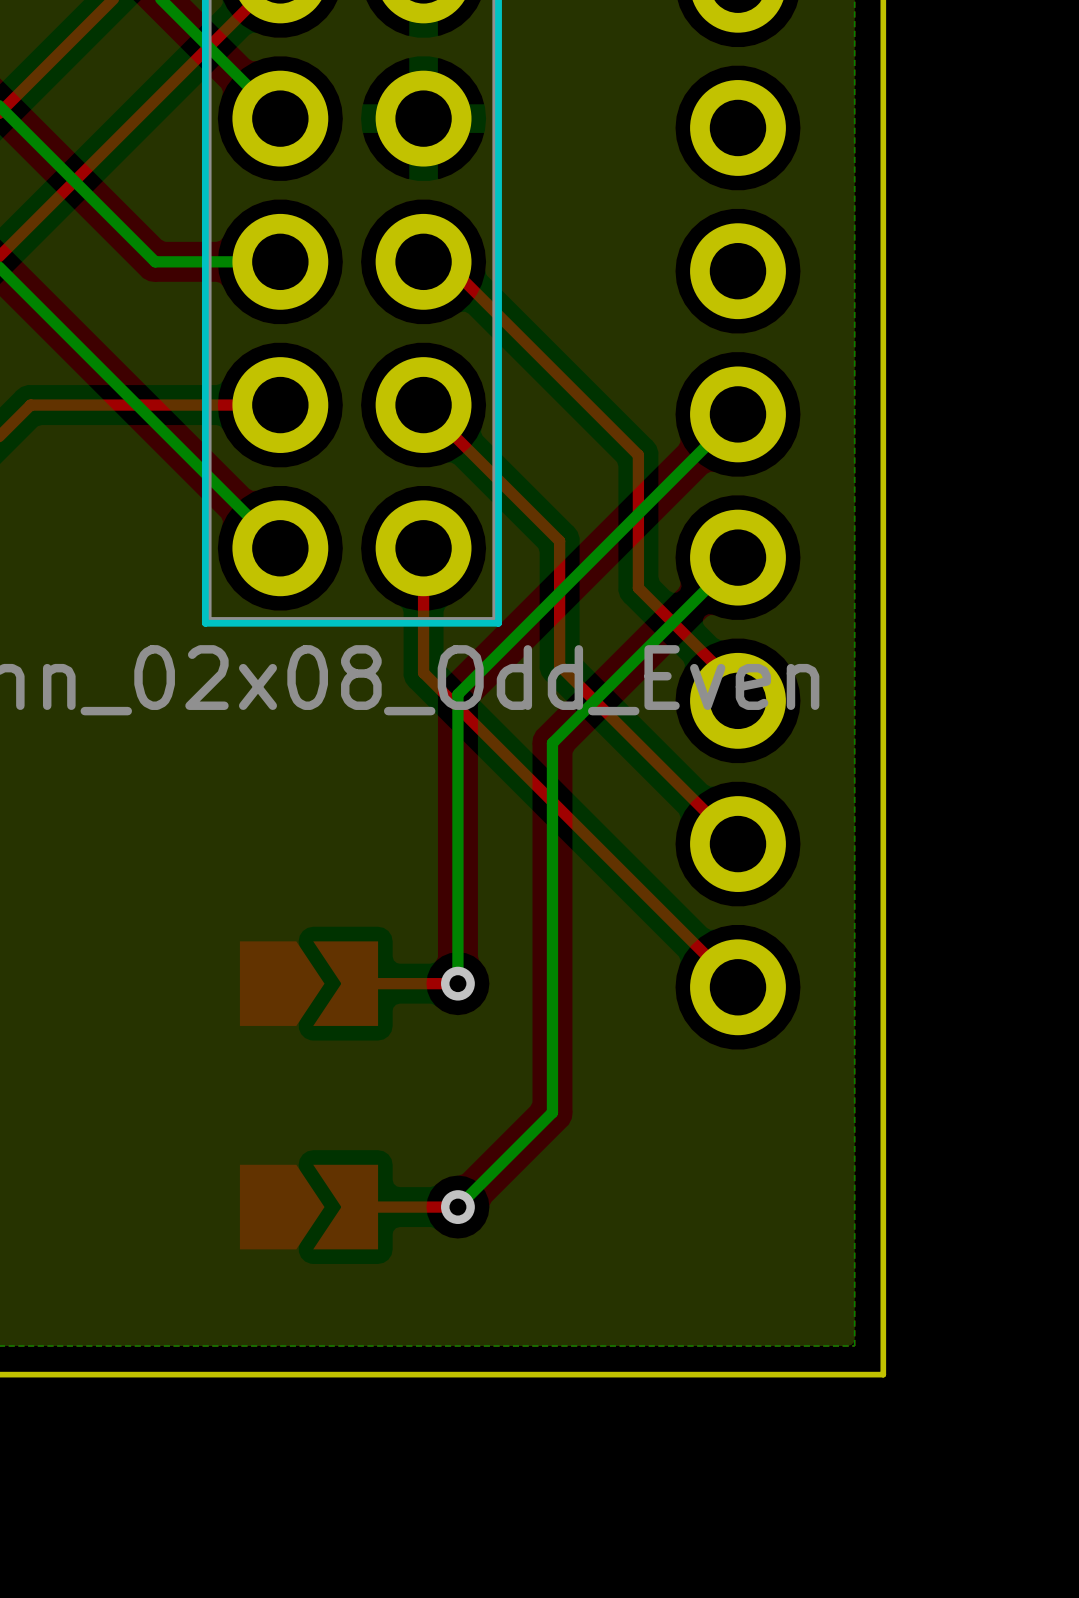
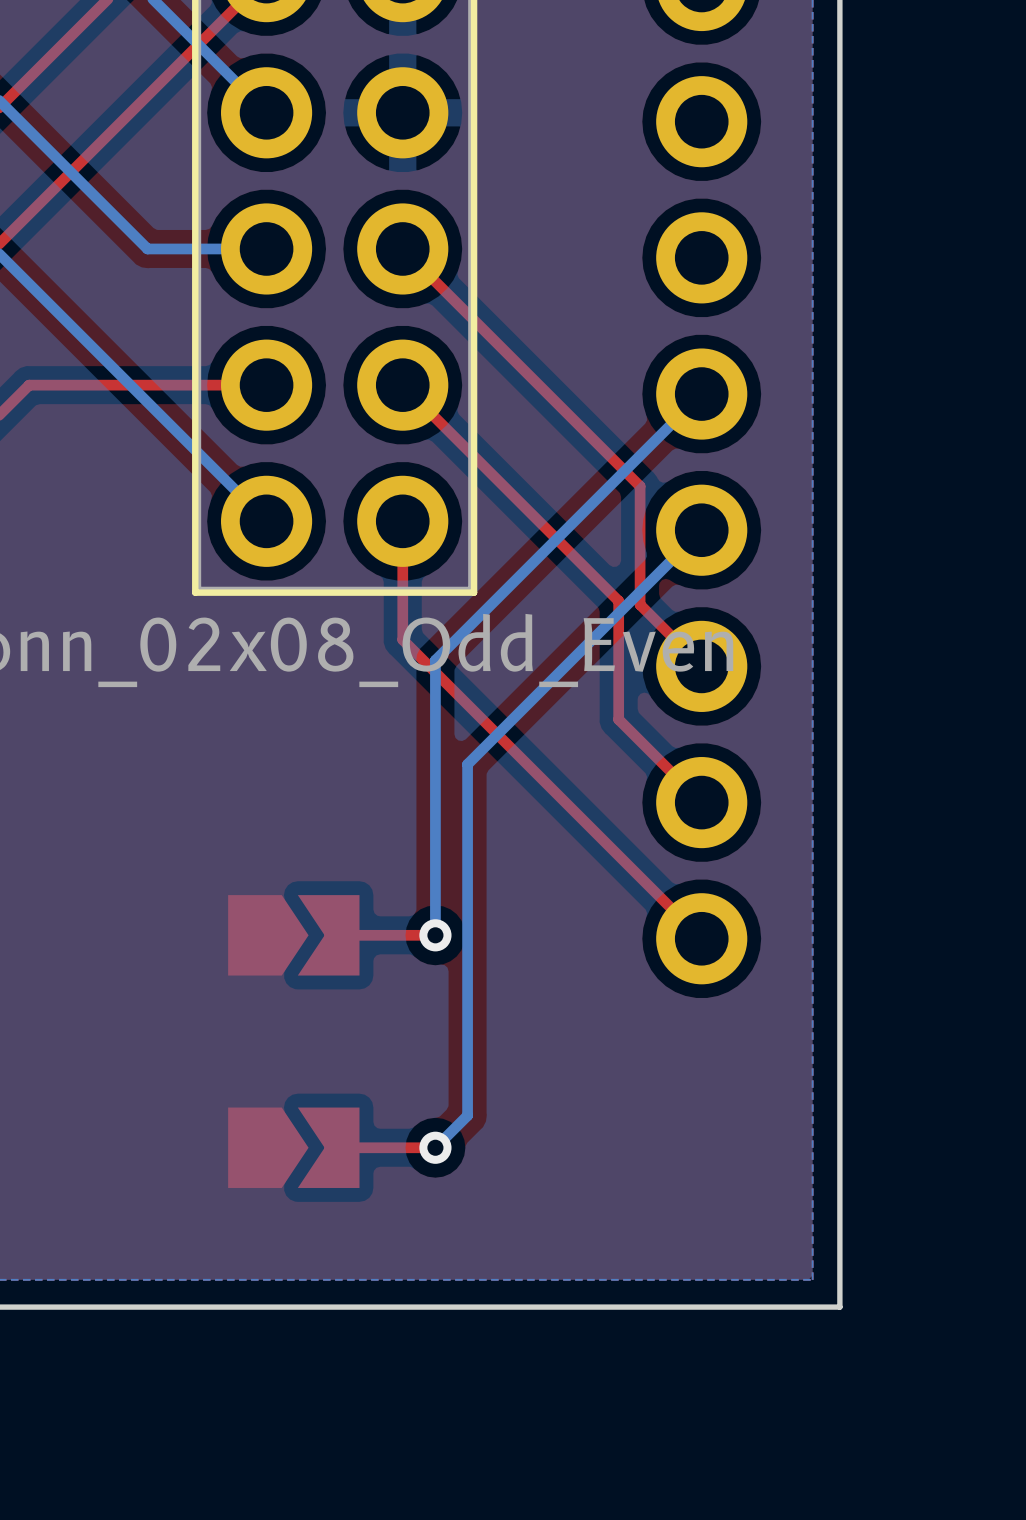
top track: (423, 261) (445, 261) (638, 455) (638, 588) (737, 687) (737, 700) -> (402, 248) (640, 486) (640, 604) (701, 666)
top track: (559, 541) (559, 665) (650, 756) -> (532, 514) (618, 601) (618, 719)
bottom track: (552, 743) (552, 1112) (491, 1173) -> (525, 706) (467, 764) (467, 1115)

